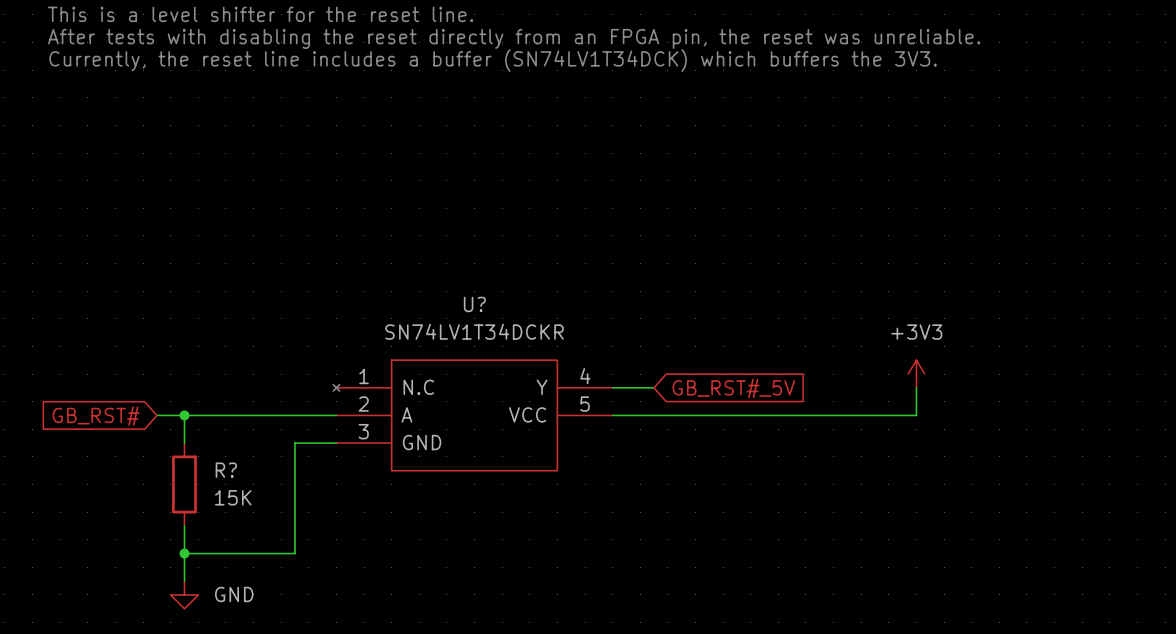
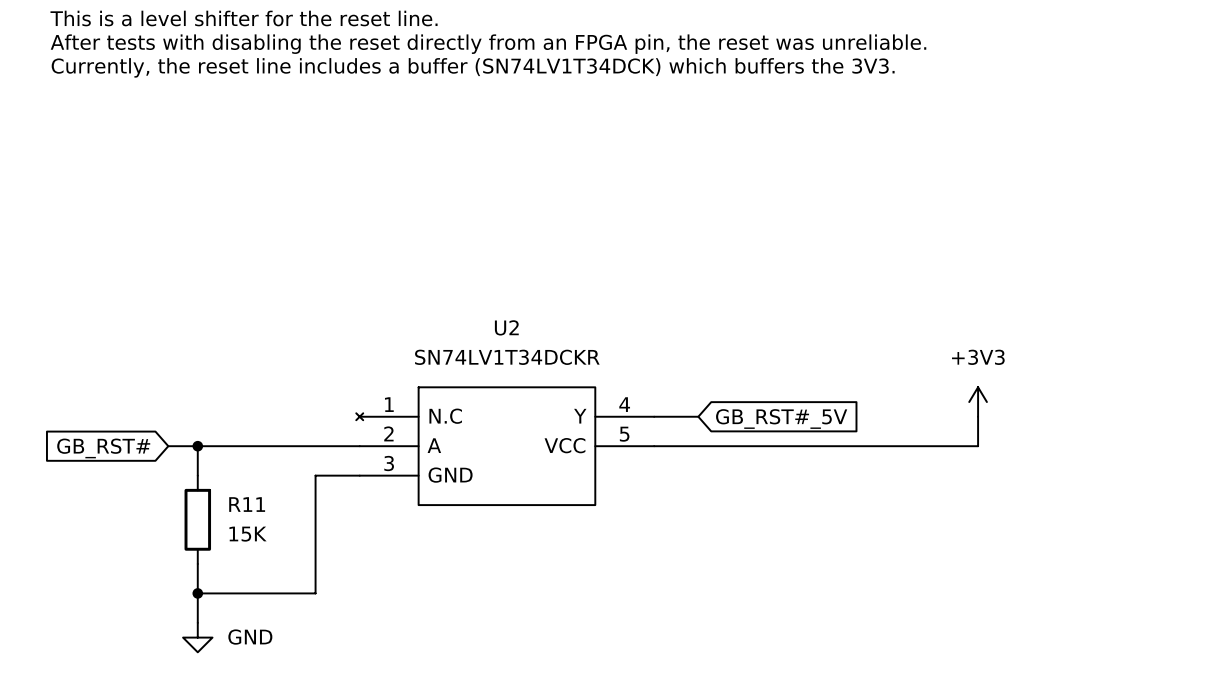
U? name: U? (474, 304) -> U2 (506, 327)
R? name: R? (226, 470) -> R11 (247, 504)

